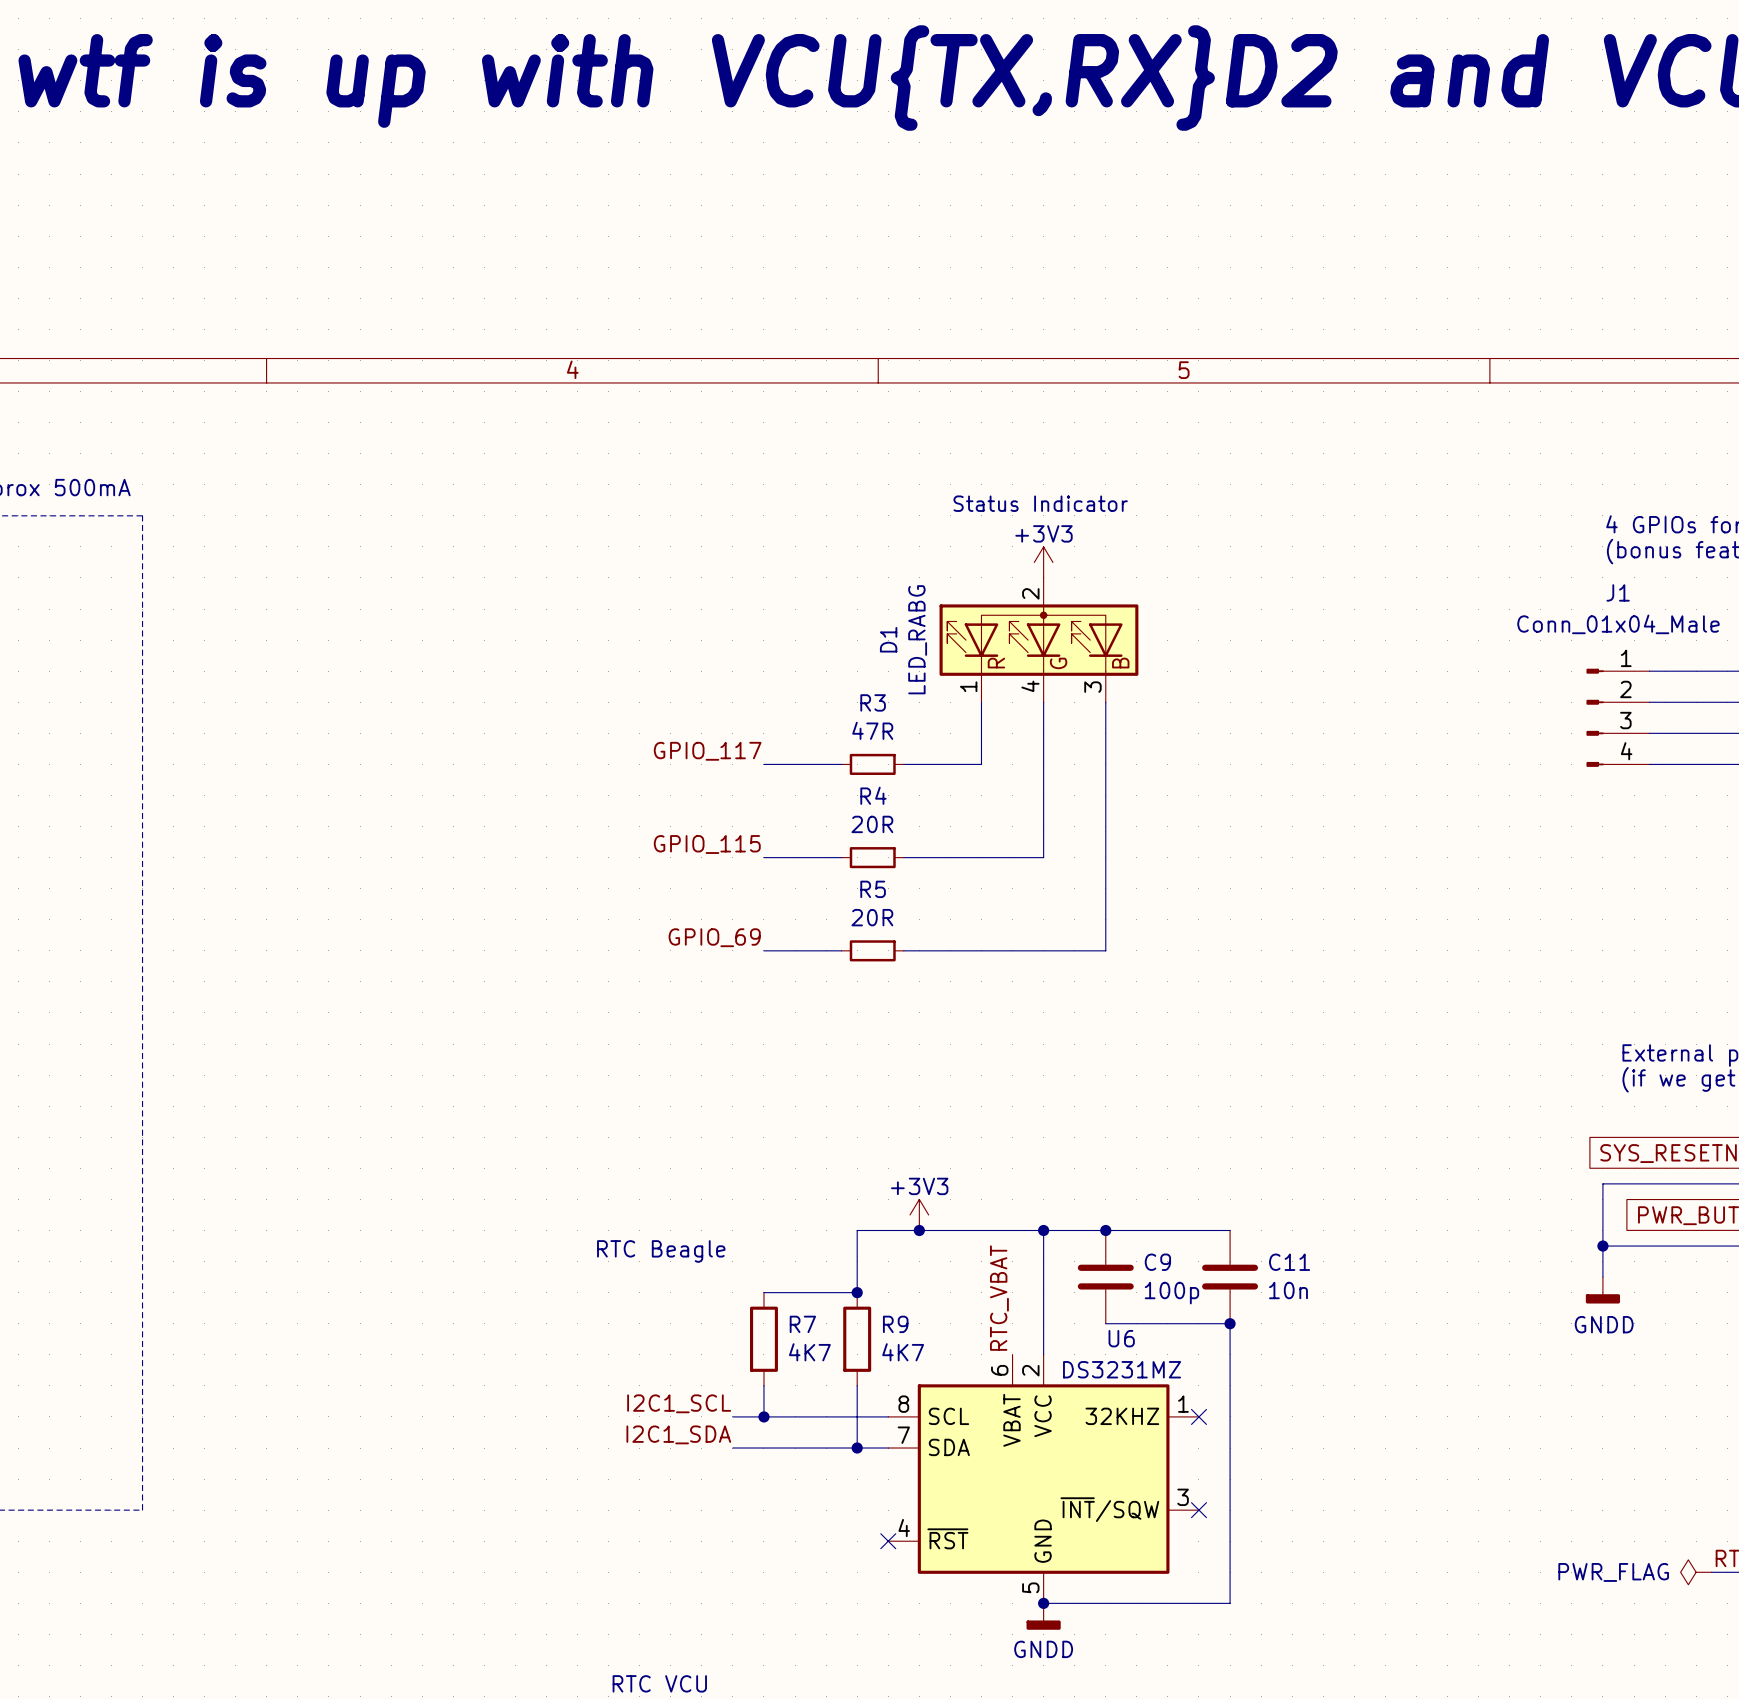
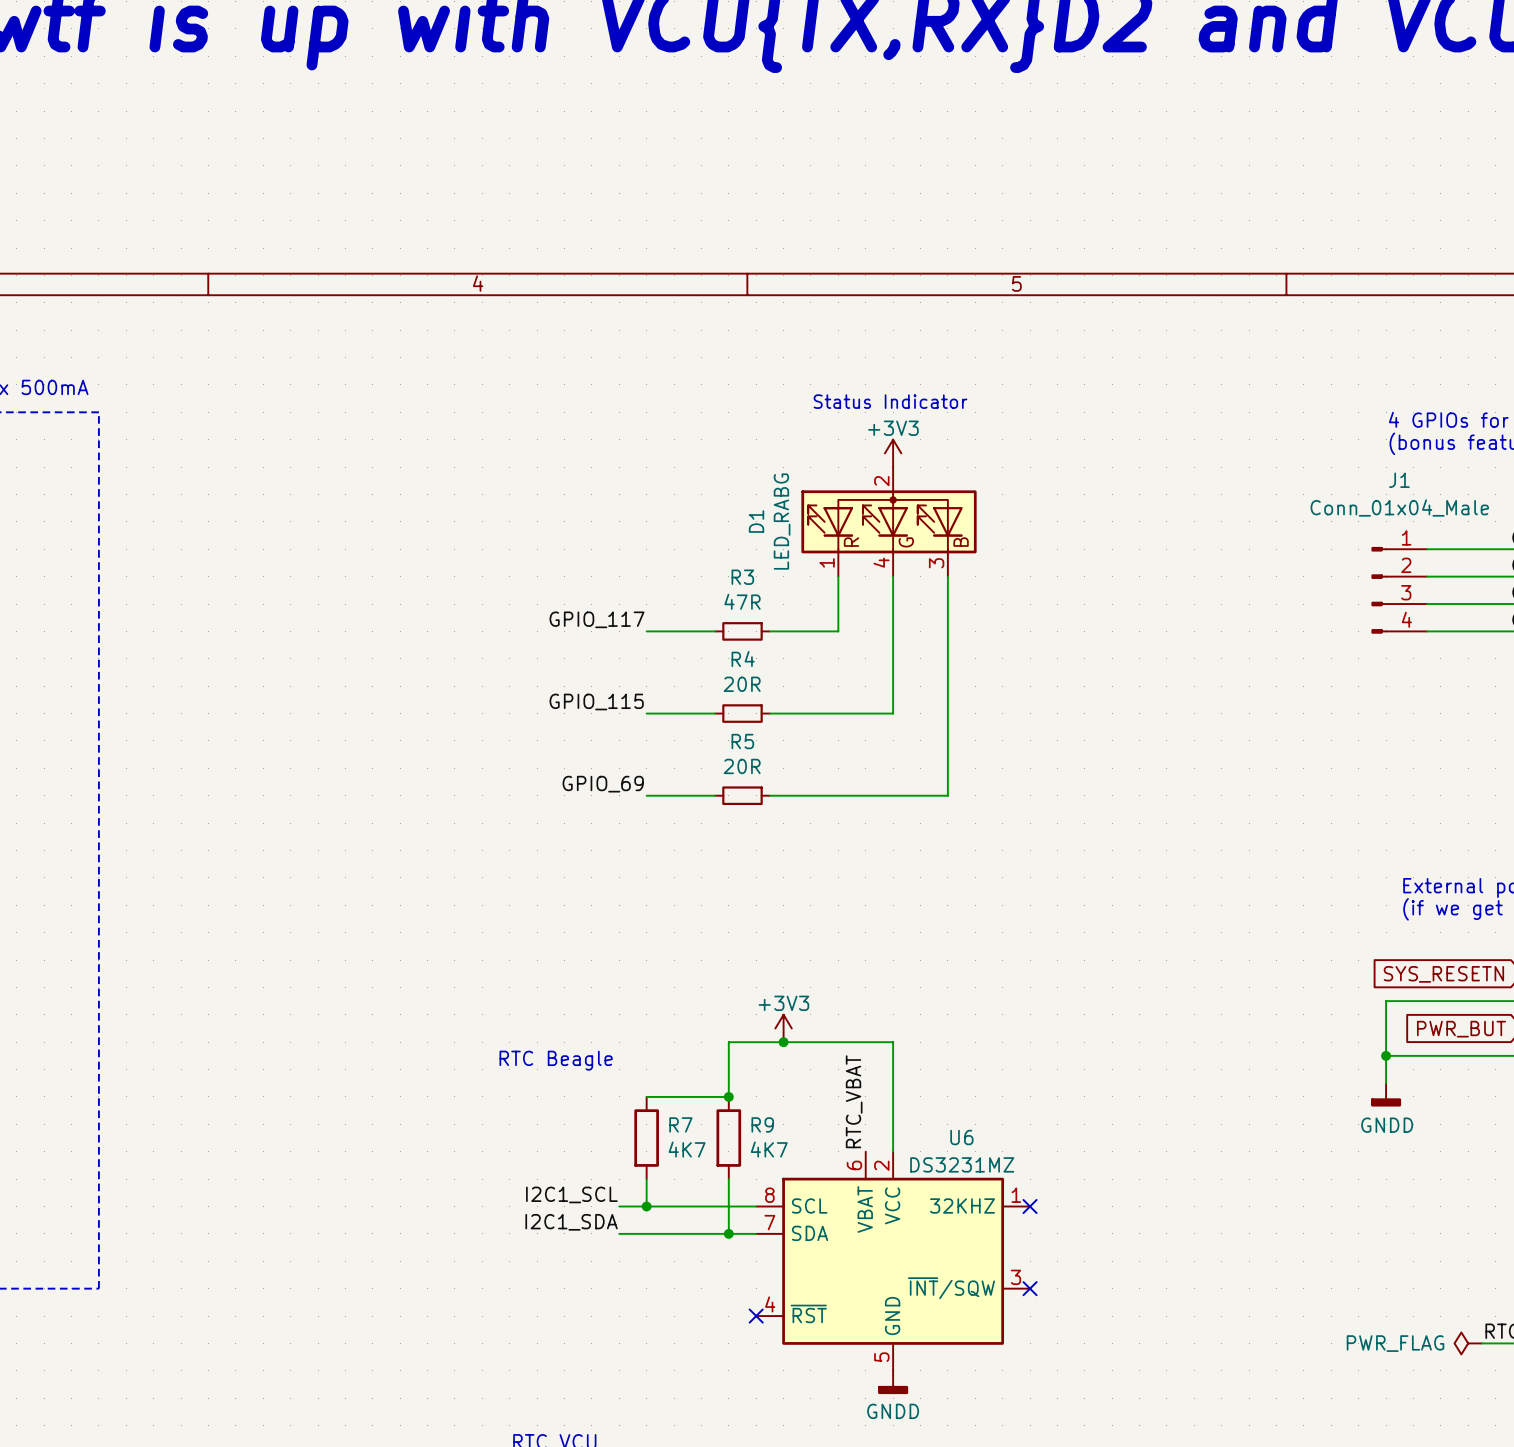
wire: (1043, 1230) (1230, 1230) -> none
junction: (1043, 1230) -> none
junction: (1105, 1230) -> none
C9: 100p (1105, 1277) -> none
C11: 10n (1230, 1277) -> none
wire: (1105, 1323) (1230, 1323) (1230, 1603) (1043, 1603) -> none
junction: (1230, 1323) -> none
junction: (1043, 1603) -> none

